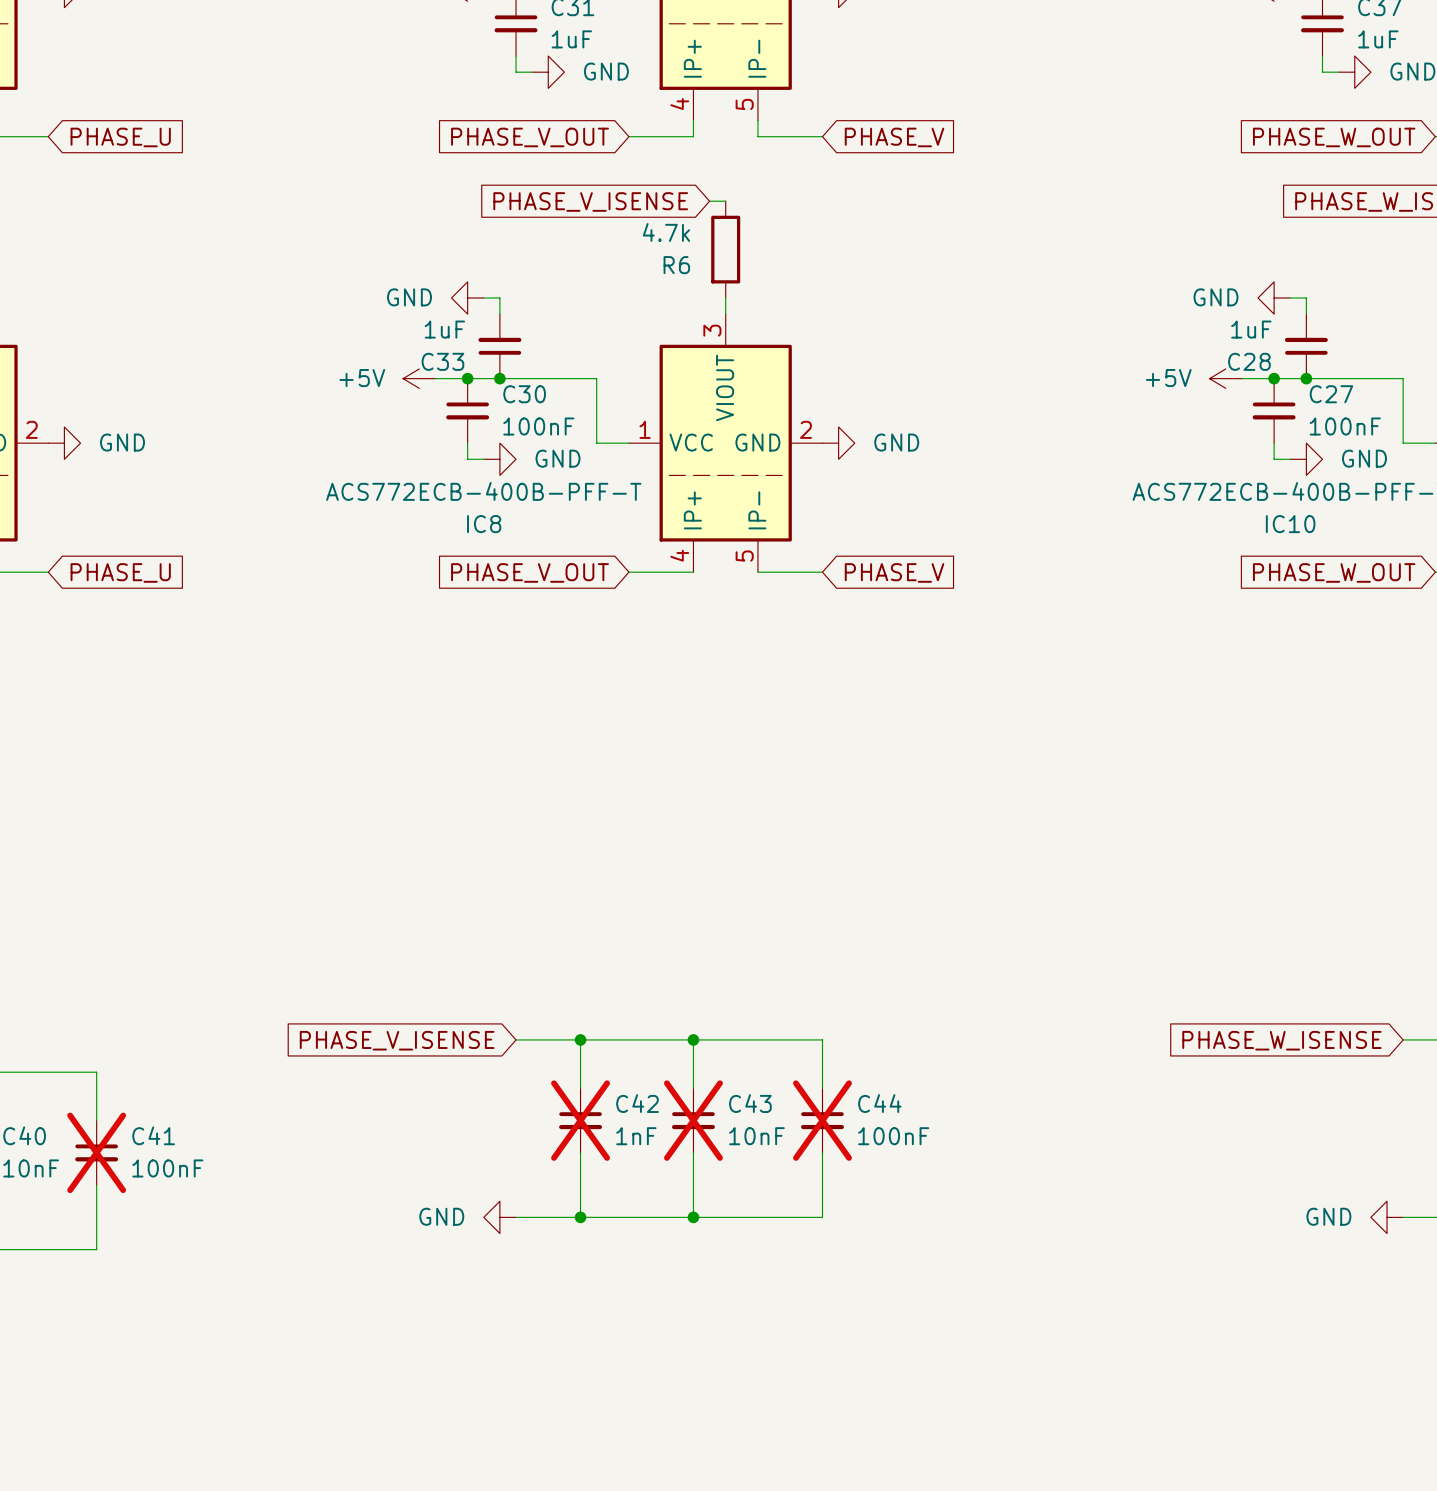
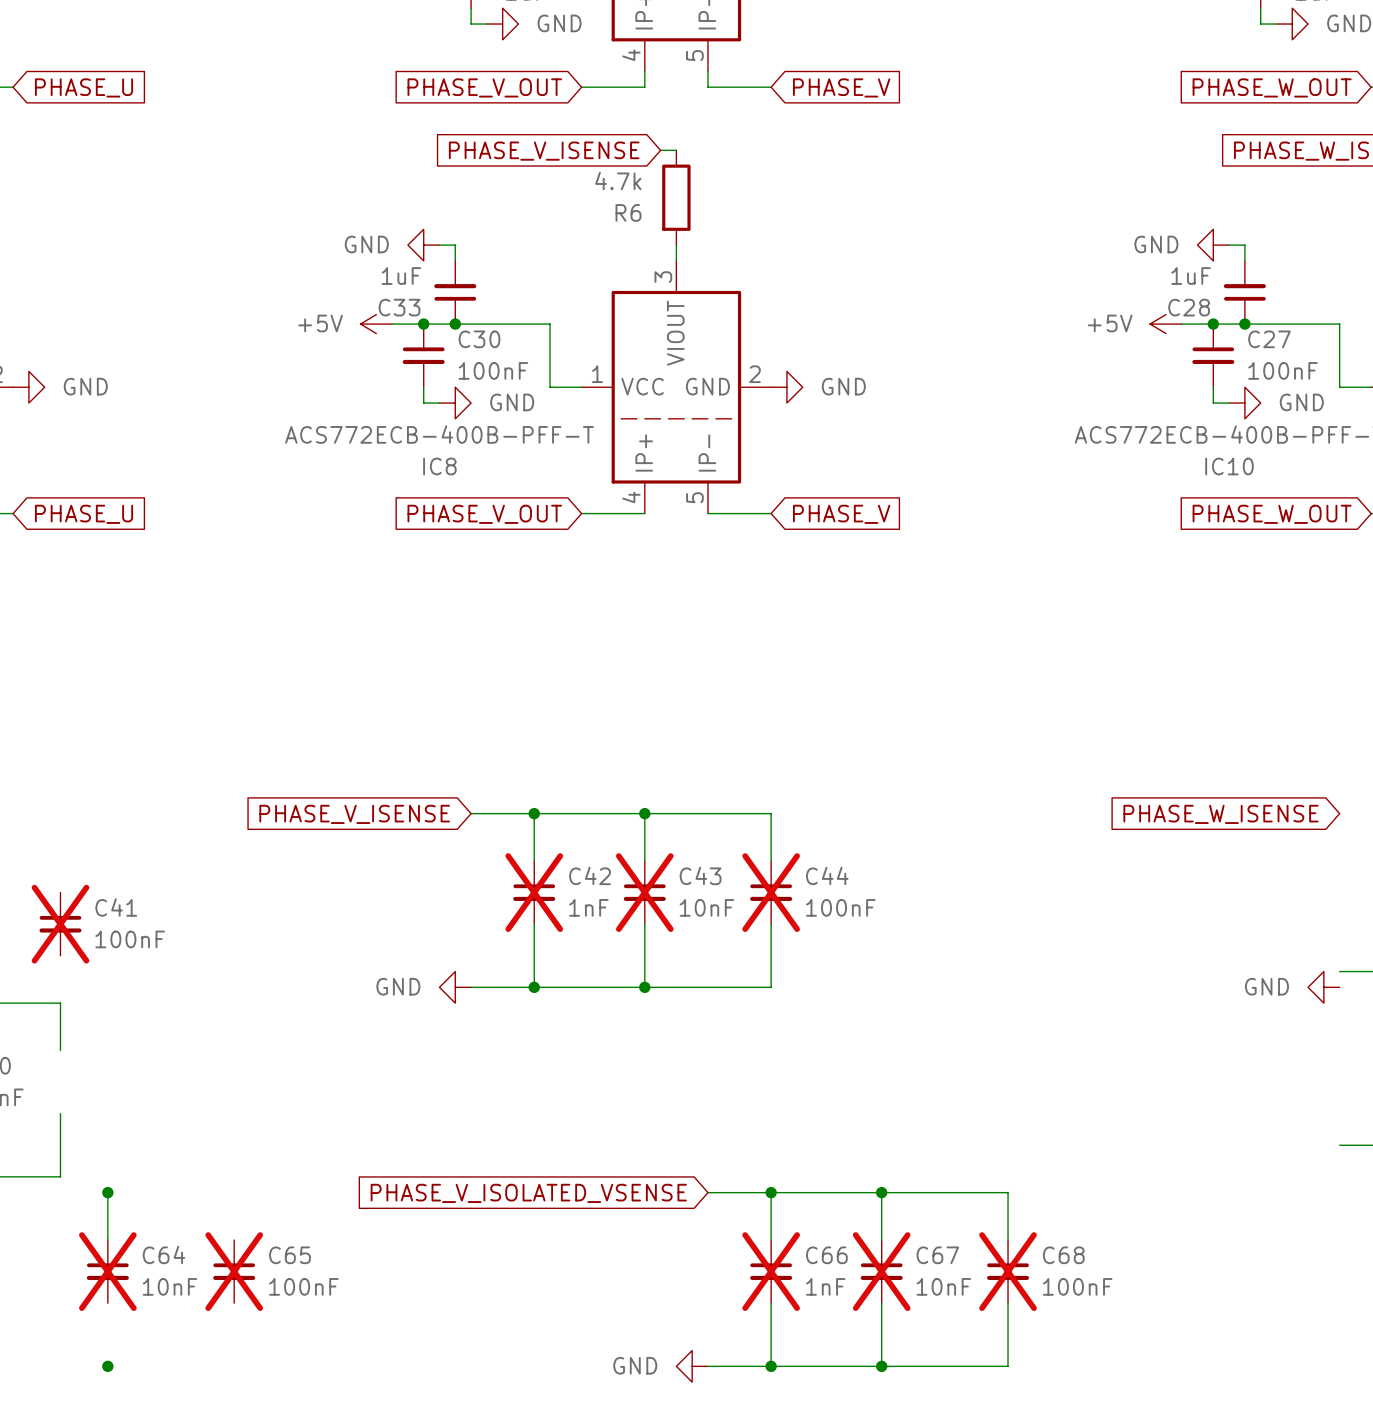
wire: none -> (471, 813) (771, 813) (771, 861)
wire: none -> (534, 813) (534, 861)
junction: none -> (534, 813)
wire: none -> (644, 813) (644, 861)
junction: none -> (644, 813)
wire: none -> (534, 924) (534, 971)
wire: none -> (644, 924) (644, 971)
wire: (516, 1039) (822, 1039) -> (771, 924) (771, 971)
junction position: (580, 1039) -> (534, 987)
junction position: (693, 1039) -> (644, 987)
global label position: PHASE_V_ISENSE (397, 1040) -> PHASE_V_ISENSE (354, 814)
global label position: PHASE_W_ISENSE (1281, 1040) -> PHASE_W_ISENSE (1221, 814)
wire: (580, 1056) (580, 1088) -> none
wire: (693, 1056) (693, 1088) -> none
wire: (822, 1056) (822, 1088) -> (771, 987) (471, 987)
power symbol: none -> GND (1323, 987)
C42 position: (580, 1120) -> (534, 892)
C43 position: (693, 1120) -> (644, 892)
C44 position: (822, 1120) -> (771, 892)
C41 position: (96, 1152) -> (60, 924)
wire: (580, 1152) (580, 1217) -> none
wire: (693, 1152) (693, 1217) -> (771, 1303) (771, 1366)
wire: (822, 1152) (822, 1217) (516, 1217) -> none
power symbol position: GND (499, 1217) -> GND (455, 987)
junction: (580, 1217) -> none
junction: (693, 1217) -> none
power symbol: GND (1387, 1217) -> none
wire: none -> (107, 1192) (107, 1240)
junction: none -> (107, 1192)
wire: none -> (707, 1192) (1008, 1192) (1008, 1240)
wire: none -> (771, 1192) (771, 1240)
junction: none -> (771, 1192)
wire: none -> (881, 1192) (881, 1240)
junction: none -> (881, 1192)
global label: none -> PHASE_V_ISOLATED_VSENSE (528, 1193)
C64: none -> 10nF (107, 1271)
C65: none -> 100nF (234, 1271)
C66: none -> 1nF (771, 1271)
C67: none -> 10nF (881, 1271)
C68: none -> 100nF (1008, 1271)
wire: none -> (881, 1303) (881, 1366)
wire: none -> (1008, 1303) (1008, 1366) (707, 1366)
junction: none -> (107, 1366)
power symbol: none -> GND (692, 1366)
junction: none -> (771, 1366)
junction: none -> (881, 1366)

